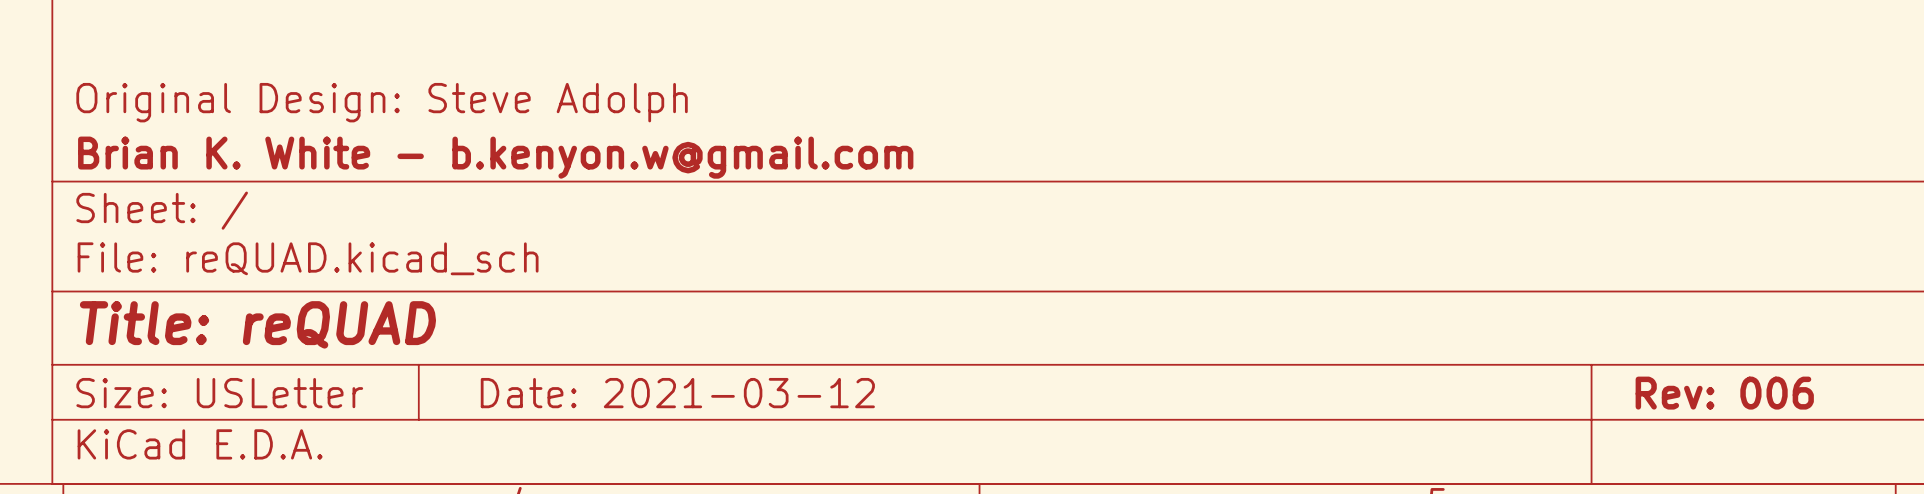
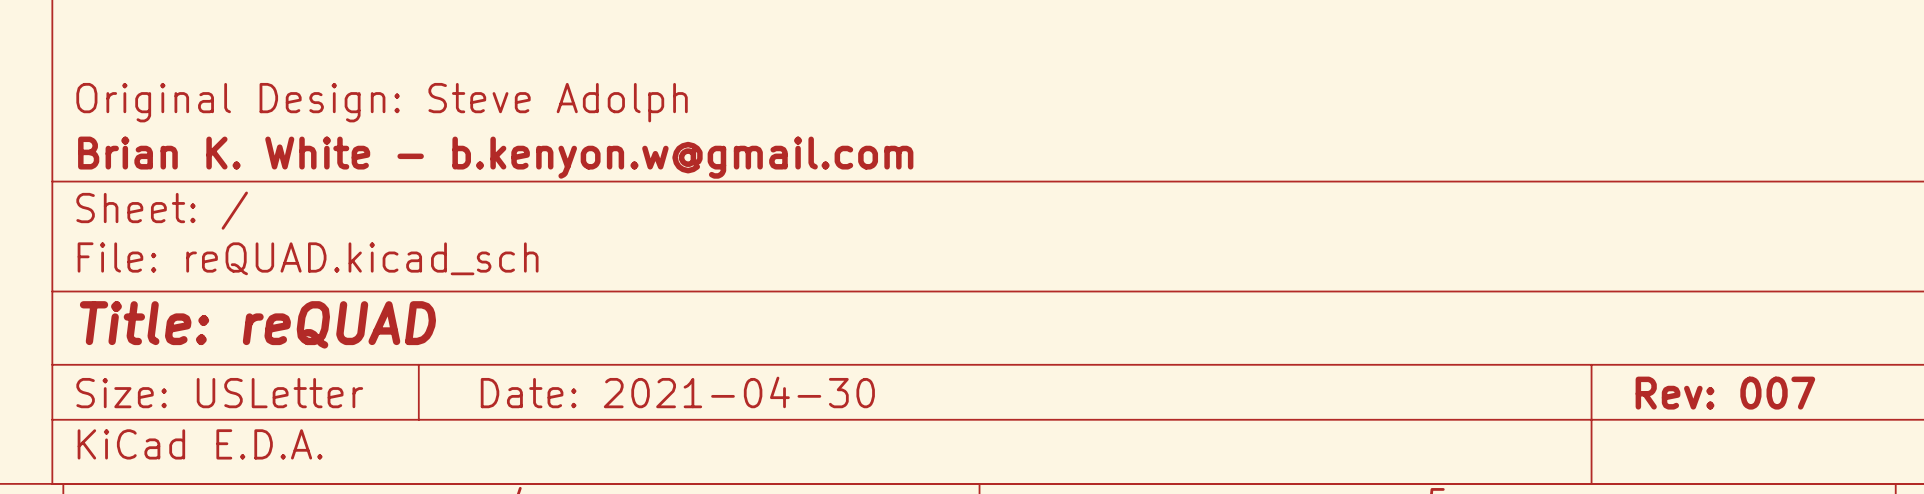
title block: Date: 2021-03-12 (677, 393) -> Date: 2021-04-30 (677, 392)
title block: Rev: 006 (1724, 393) -> Rev: 007 (1725, 393)

